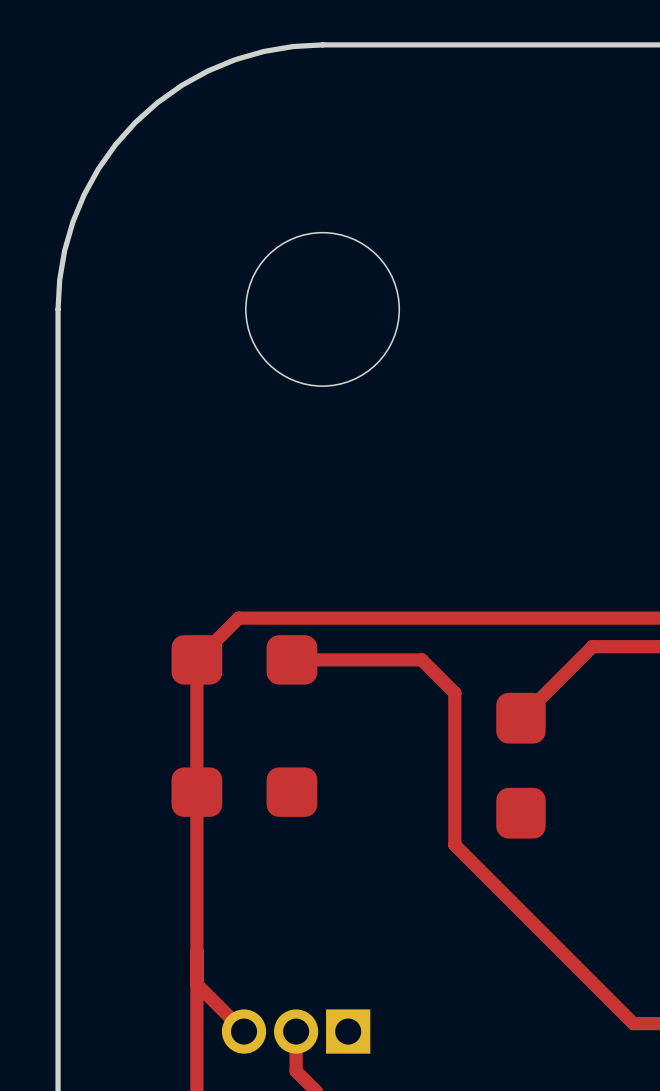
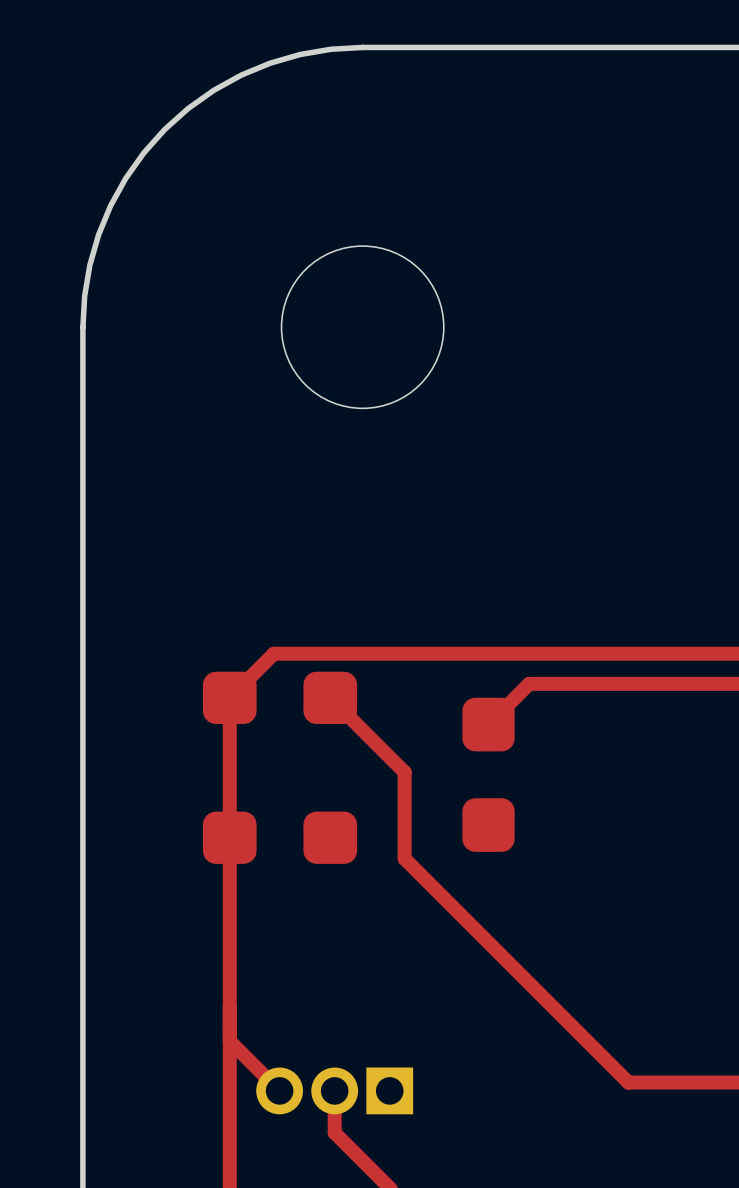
top track: (592, 646) (520, 718) -> (648, 683) (529, 683) (488, 724)
top track: (291, 659) (421, 659) (454, 692) (454, 845) (633, 1023) -> (330, 697) (404, 772) (404, 858) (628, 1082) (691, 1082)
part position: (520, 765) -> (488, 774)

